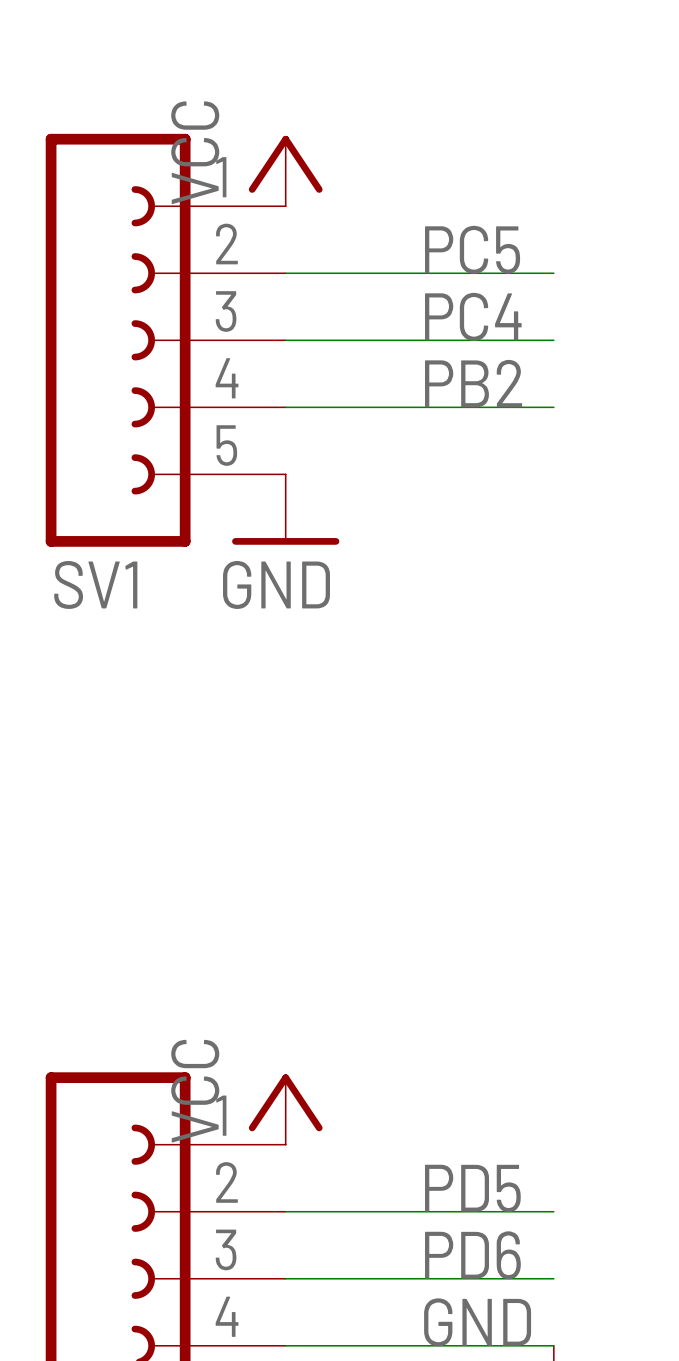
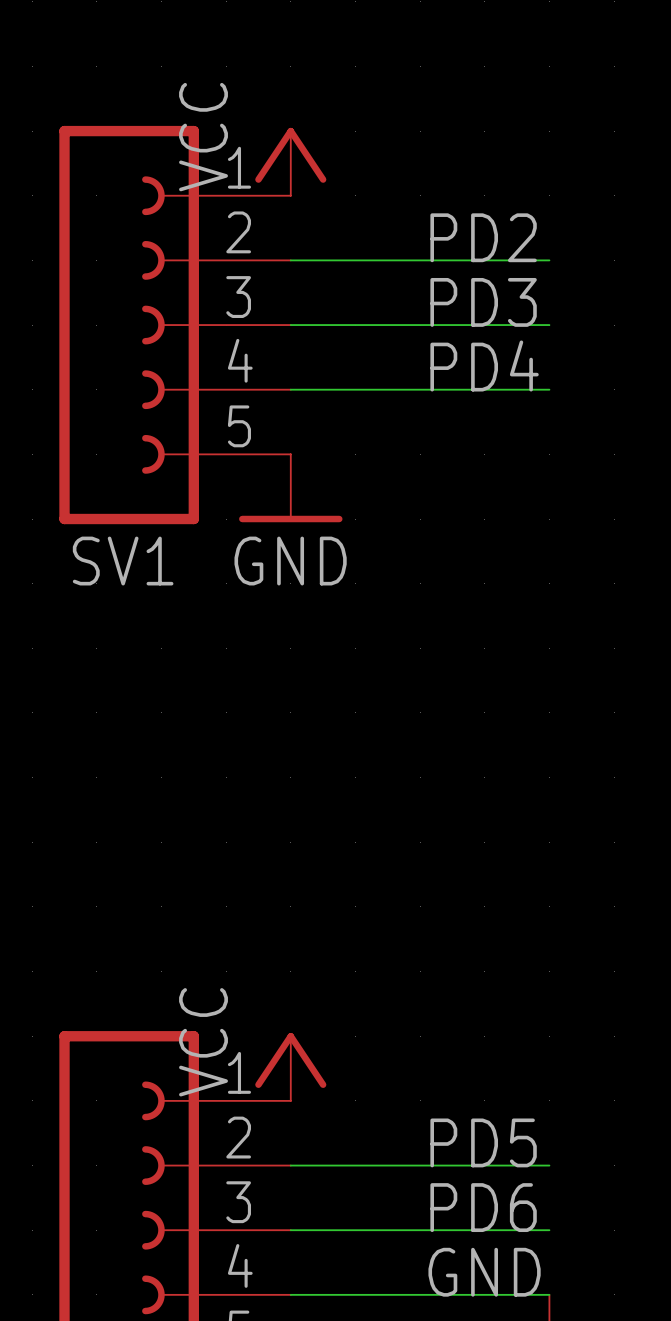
label: PC5 (472, 249) -> PD2 (483, 237)
label: PC4 (473, 316) -> PD3 (483, 302)
label: PB2 (473, 383) -> PD4 (484, 365)

